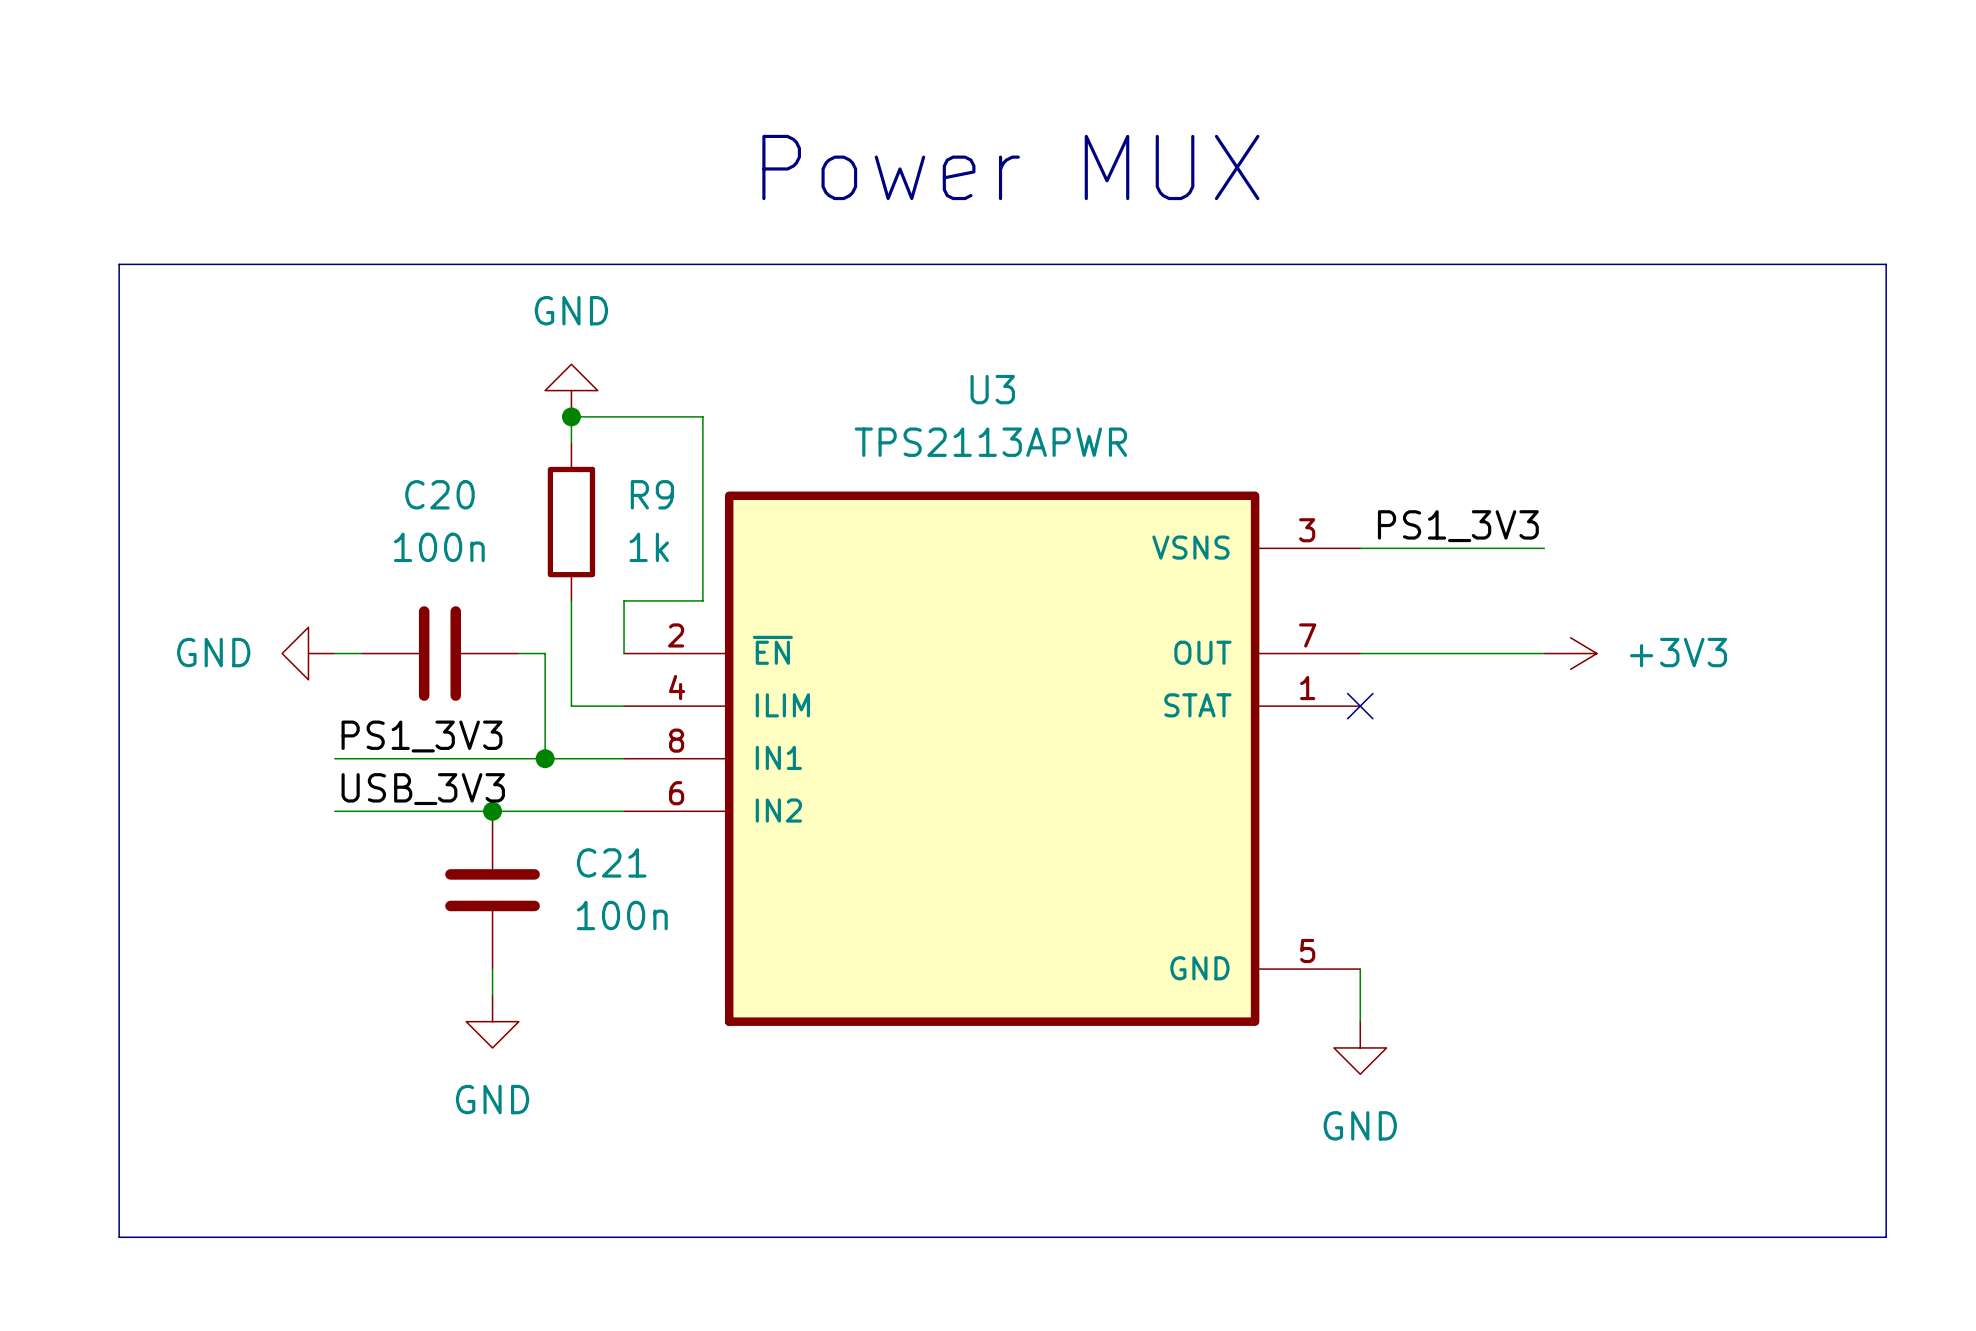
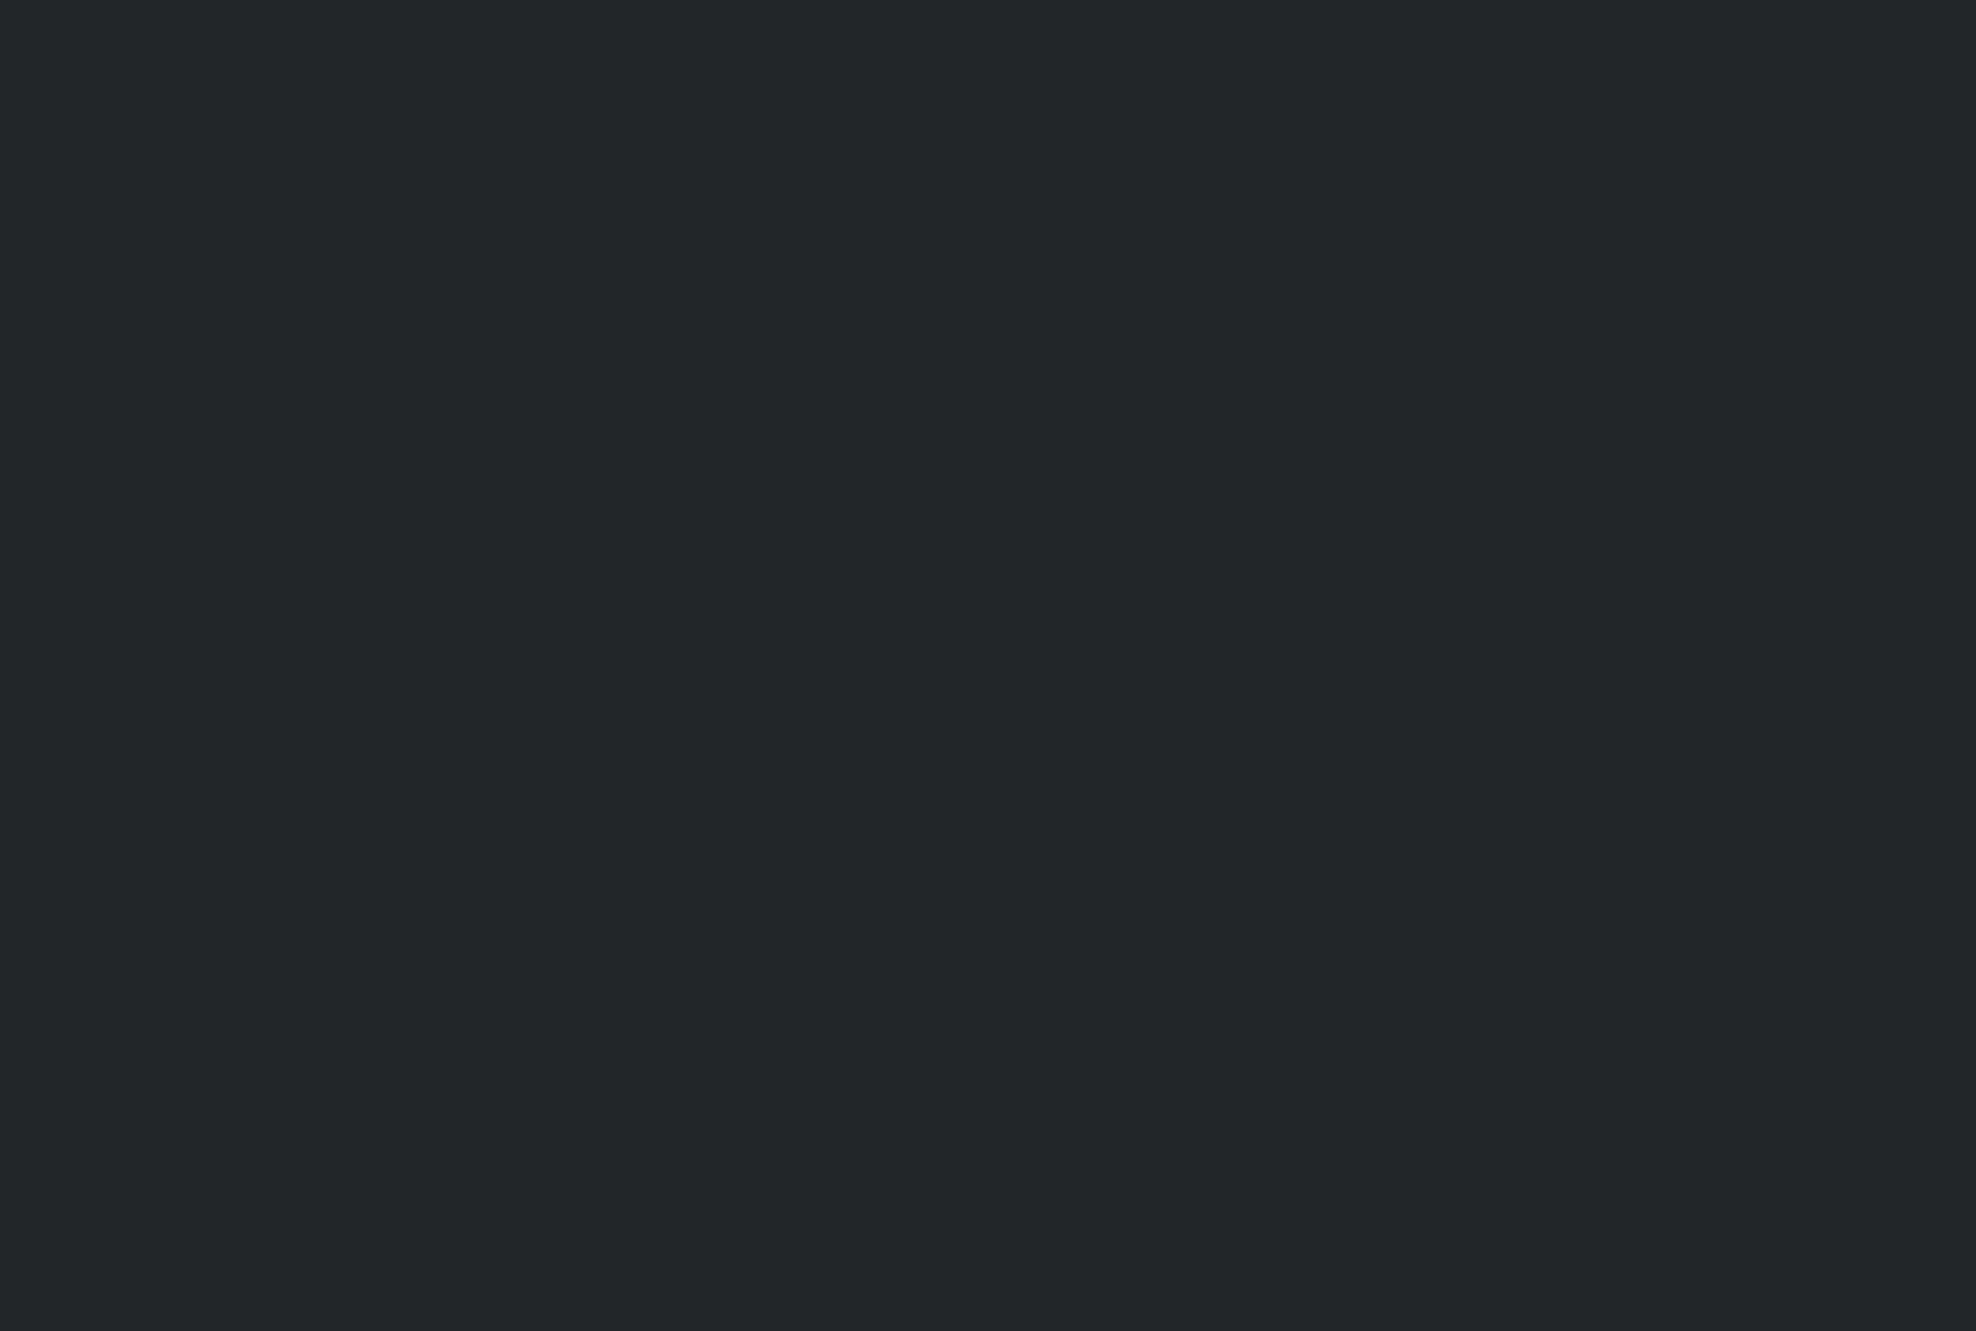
text: Power MUX (1010, 167) -> none
line: (119, 264) (1886, 264) (1886, 1237) (119, 1237) (119, 264) -> none
power symbol: GND (571, 390) -> none
junction: (571, 416) -> none
wire: (571, 443) (571, 416) (702, 416) (702, 600) (624, 600) (624, 653) -> none
R9: 1k (571, 522) -> none
label: PS1_3V3 (1458, 526) -> none
wire: (1360, 548) (1544, 548) -> none
wire: (571, 600) (571, 706) (624, 706) -> none
power symbol: GND (308, 653) -> none
wire: (334, 653) (361, 653) -> none
C20: 100n (439, 653) -> none
wire: (518, 653) (545, 653) (545, 758) -> none
wire: (1360, 653) (1544, 653) -> none
power symbol: +3V3 (1570, 653) -> none
no-connect mark: (1360, 706) -> none
label: PS1_3V3 (422, 736) -> none
wire: (334, 758) (624, 758) -> none
junction: (545, 758) -> none
U3: TPS2113APWR (992, 758) -> none
label: USB_3V3 (423, 789) -> none
wire: (334, 811) (624, 811) -> none
junction: (492, 811) -> none
C21: 100n (492, 890) -> none
wire: (492, 969) (492, 995) -> none
wire: (1360, 969) (1360, 1021) -> none
power symbol: GND (492, 1021) -> none
power symbol: GND (1360, 1047) -> none

